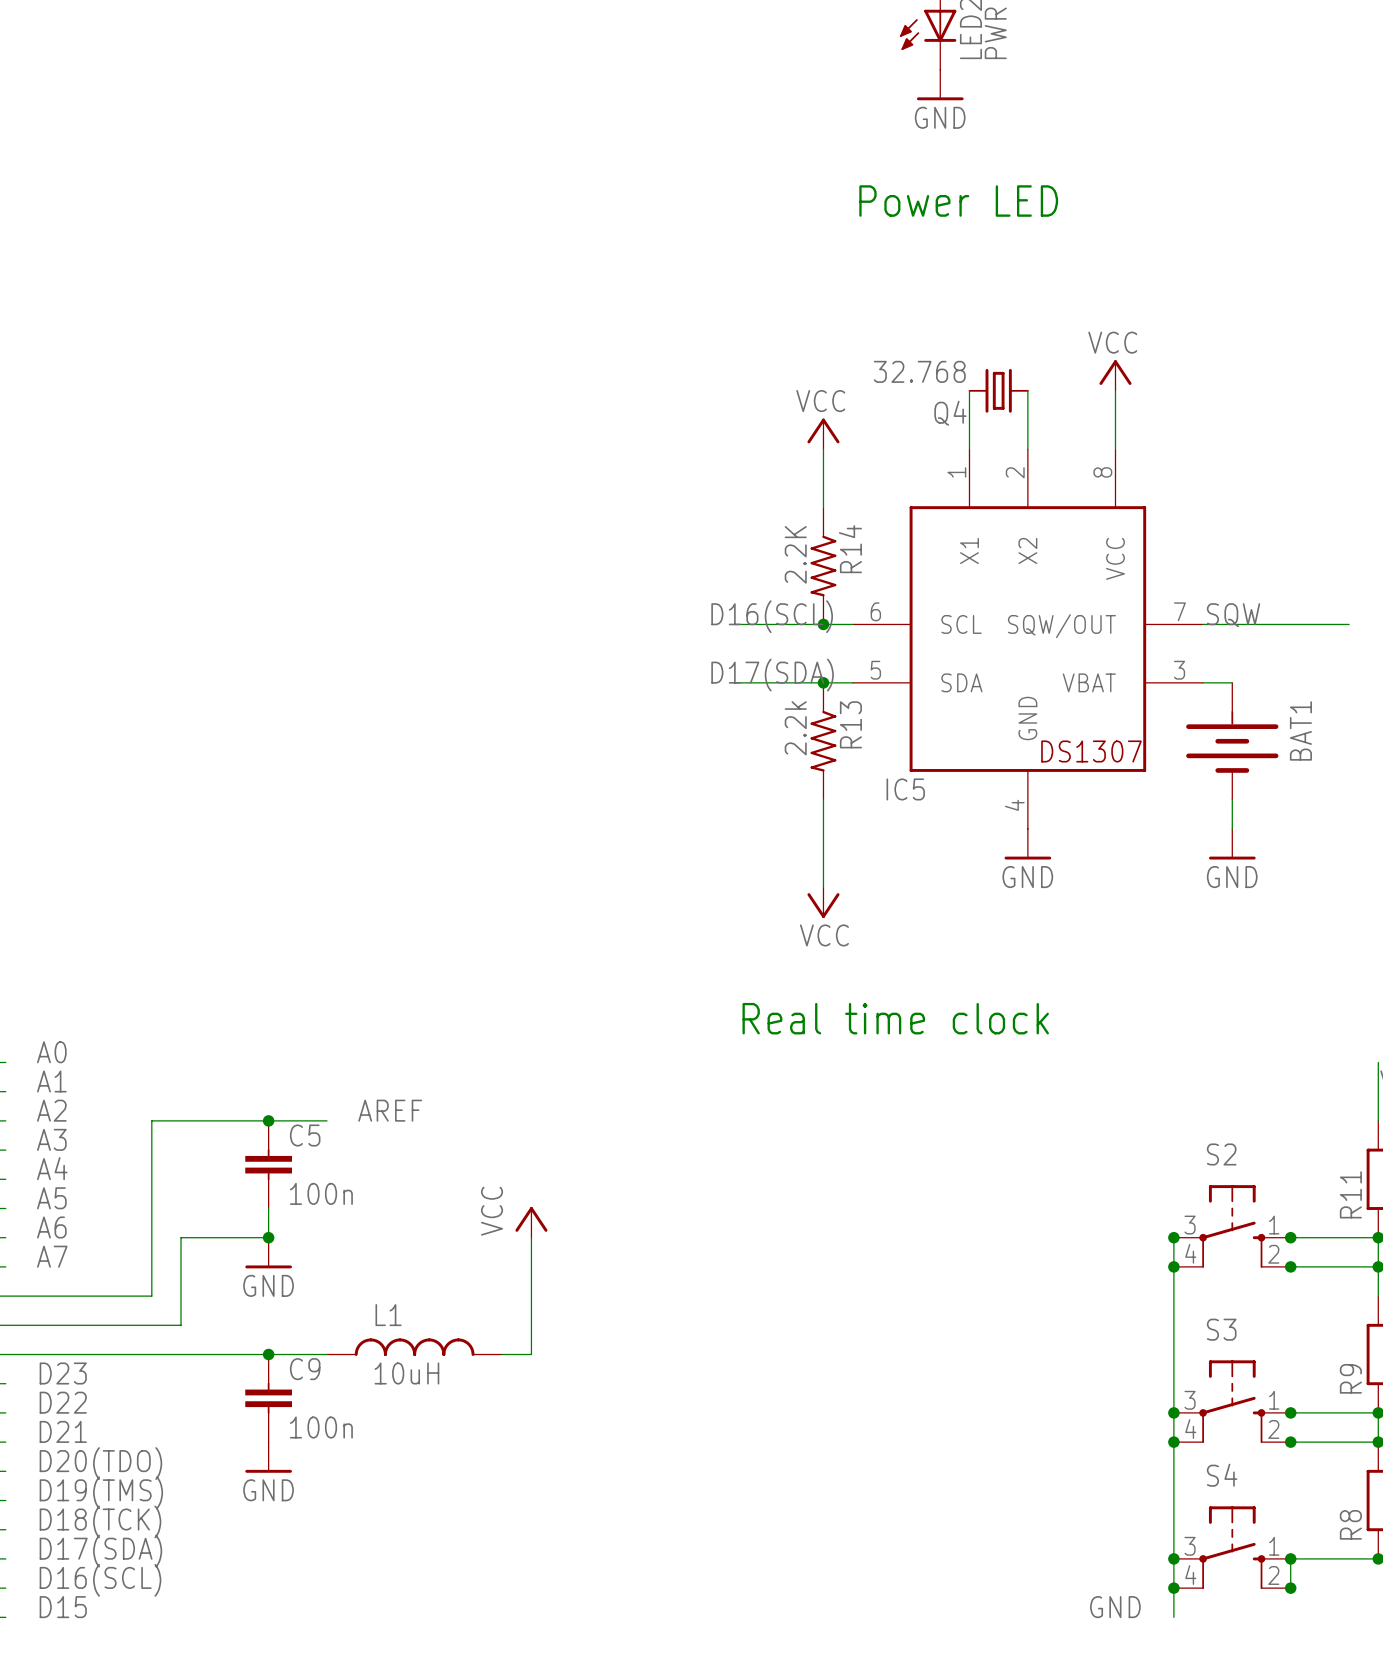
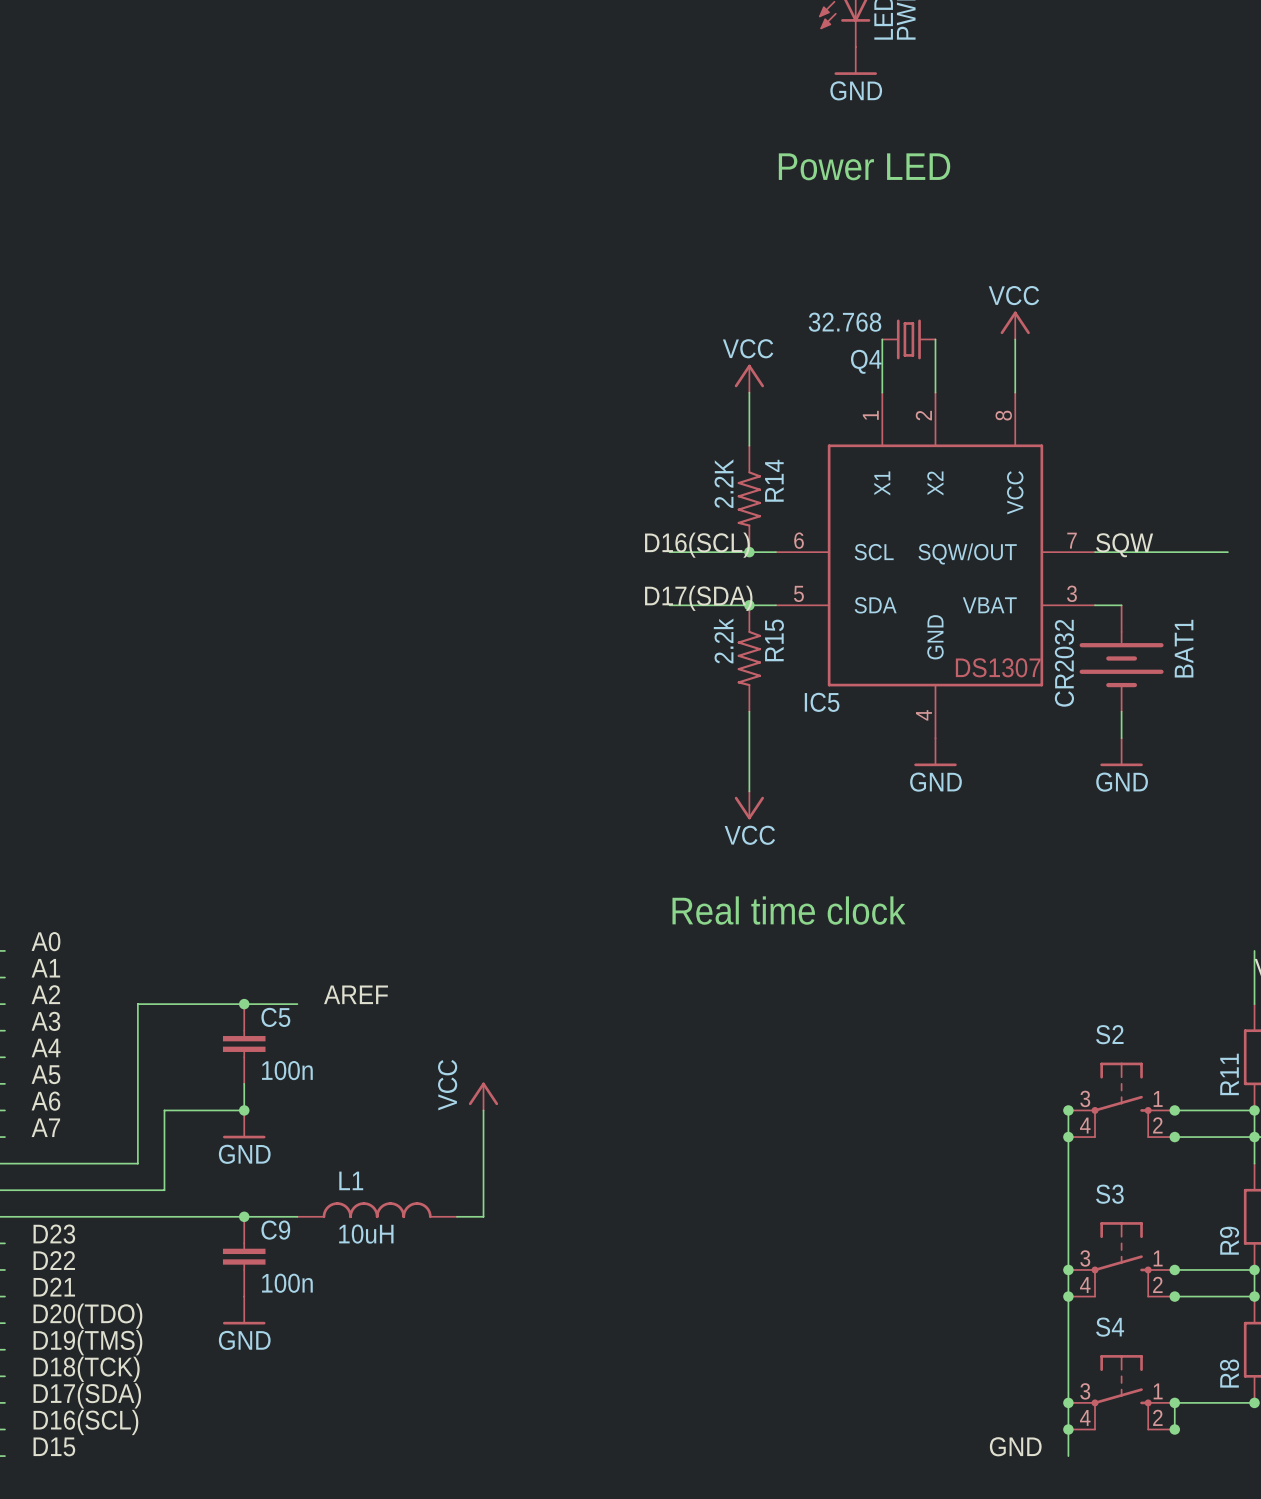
R13 name: R13 (850, 724) -> R15 (774, 640)
BAT1 value: none -> CR2032 (1064, 663)

